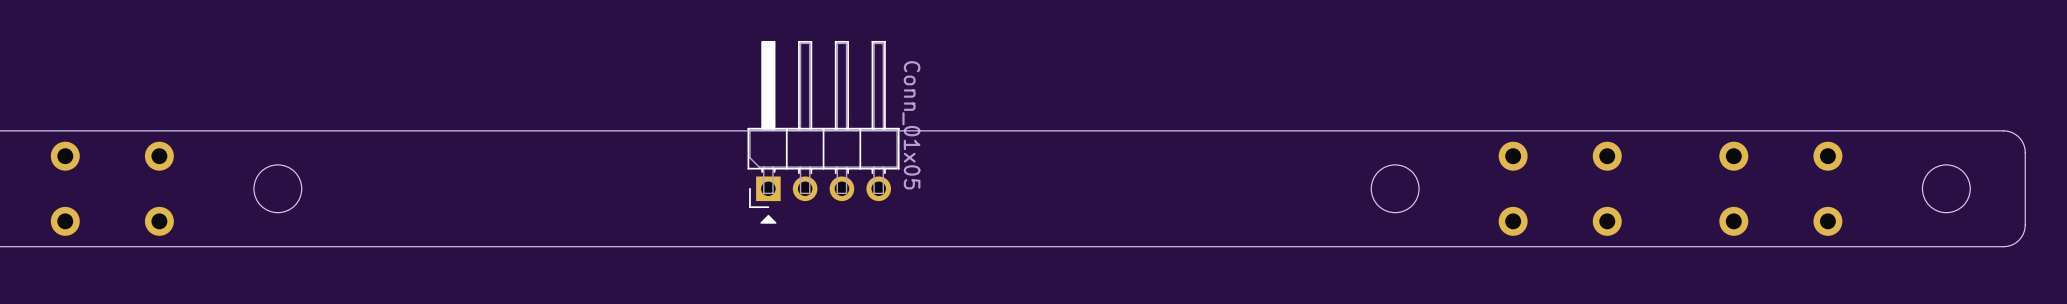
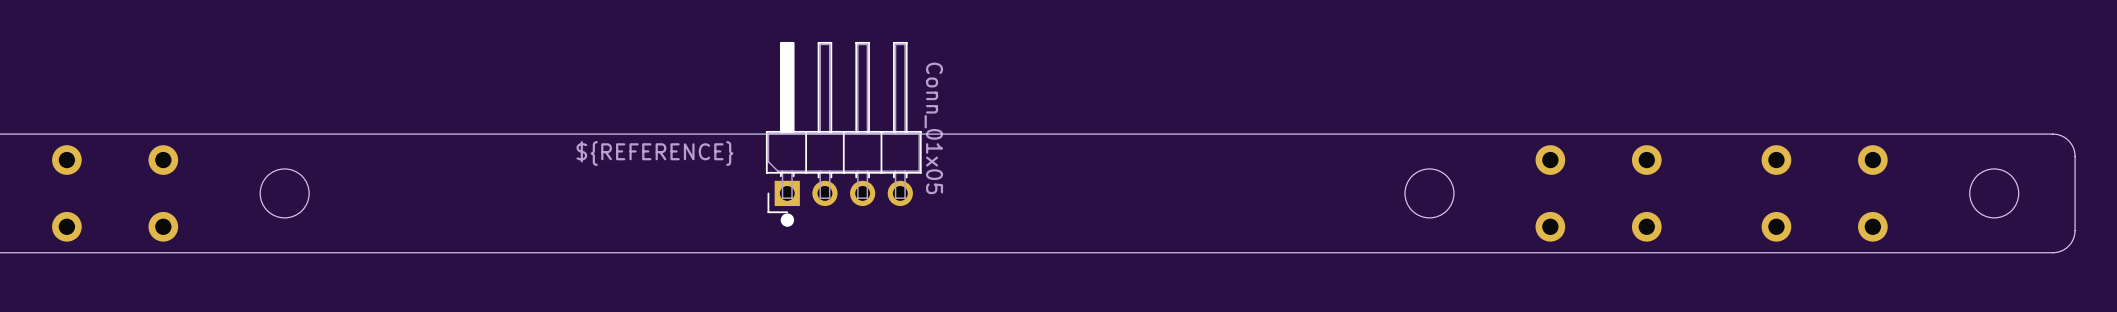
text: none -> ${REFERENCE} (654, 153)
drawing shape: [760, 214, 777, 224] -> [780, 213, 795, 227]

